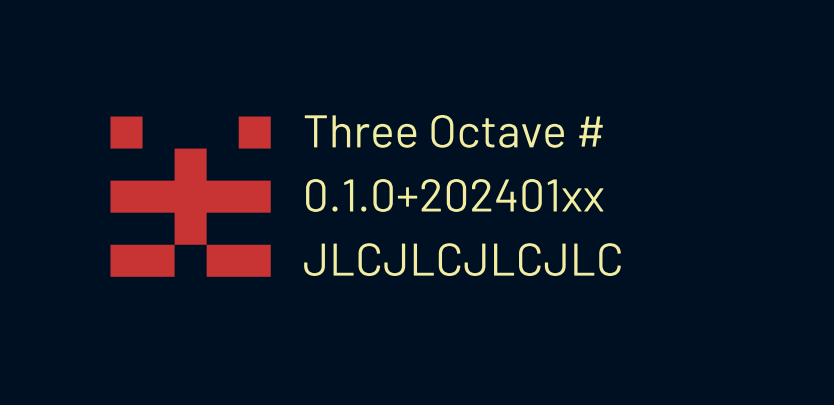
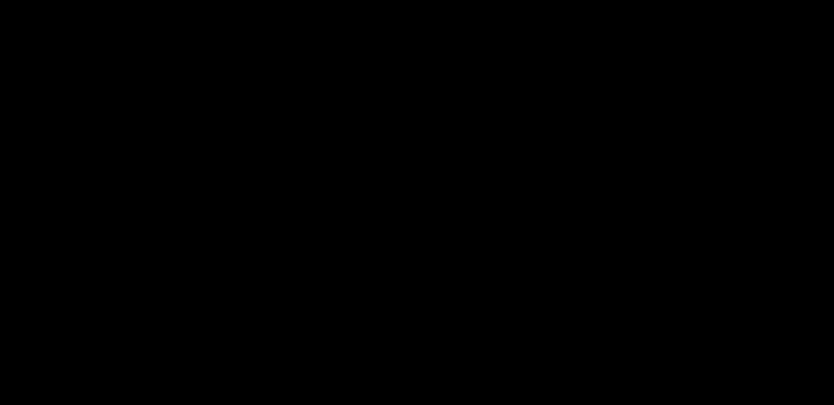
drawing: [110, 116, 271, 277] -> none
text: Three Octave # (453, 131) -> none
text: 0.1.0+202401xx (454, 195) -> none
text: JLCJLCJLCJLC (462, 259) -> none

